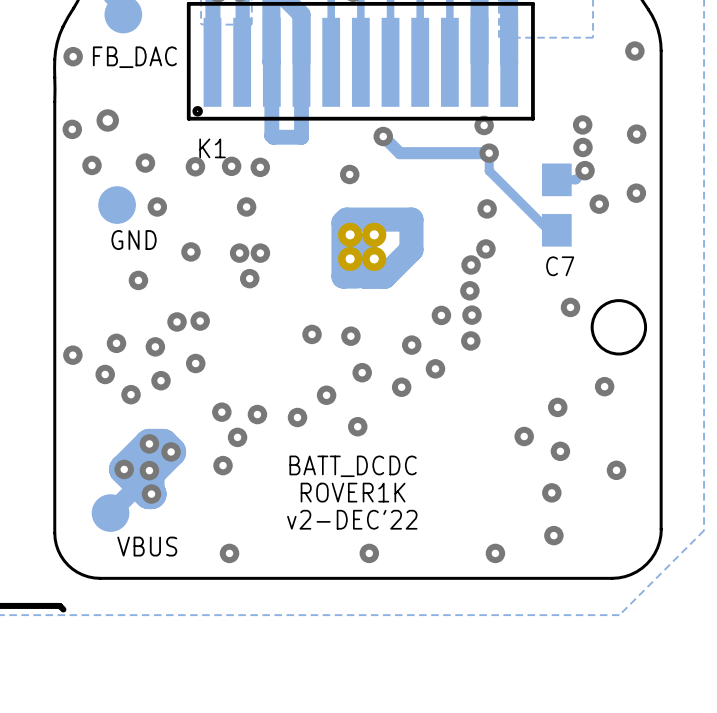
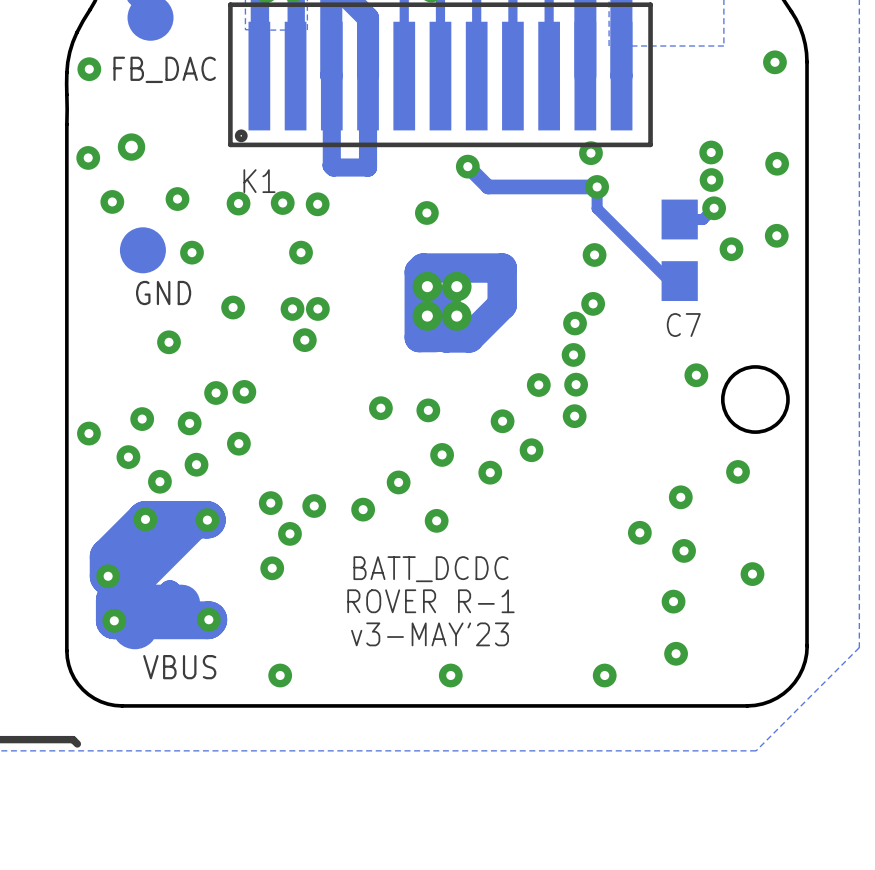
via: none -> (145, 519)
track: none -> (206, 519) (194, 520) (114, 600) (114, 620) (208, 619) (198, 619) (181, 603) (134, 603) (108, 576) (108, 556) (145, 519) (206, 519)
via: none -> (207, 520)
via: (149, 443) -> none
via: (171, 451) -> none
track: (124, 469) (149, 443) (163, 443) (171, 451) (152, 470) (149, 470) (149, 491) (151, 494) (148, 494) (124, 469) -> none
via: (124, 469) -> none
via: (149, 470) -> none
via: none -> (108, 576)
text: ROVER1K (353, 492) -> ROVER R-1 (430, 601)
via: (151, 494) -> none
via: none -> (208, 619)
via: none -> (114, 620)
text: v2-DEC'22 (352, 519) -> v3-MAY'23 (430, 634)

